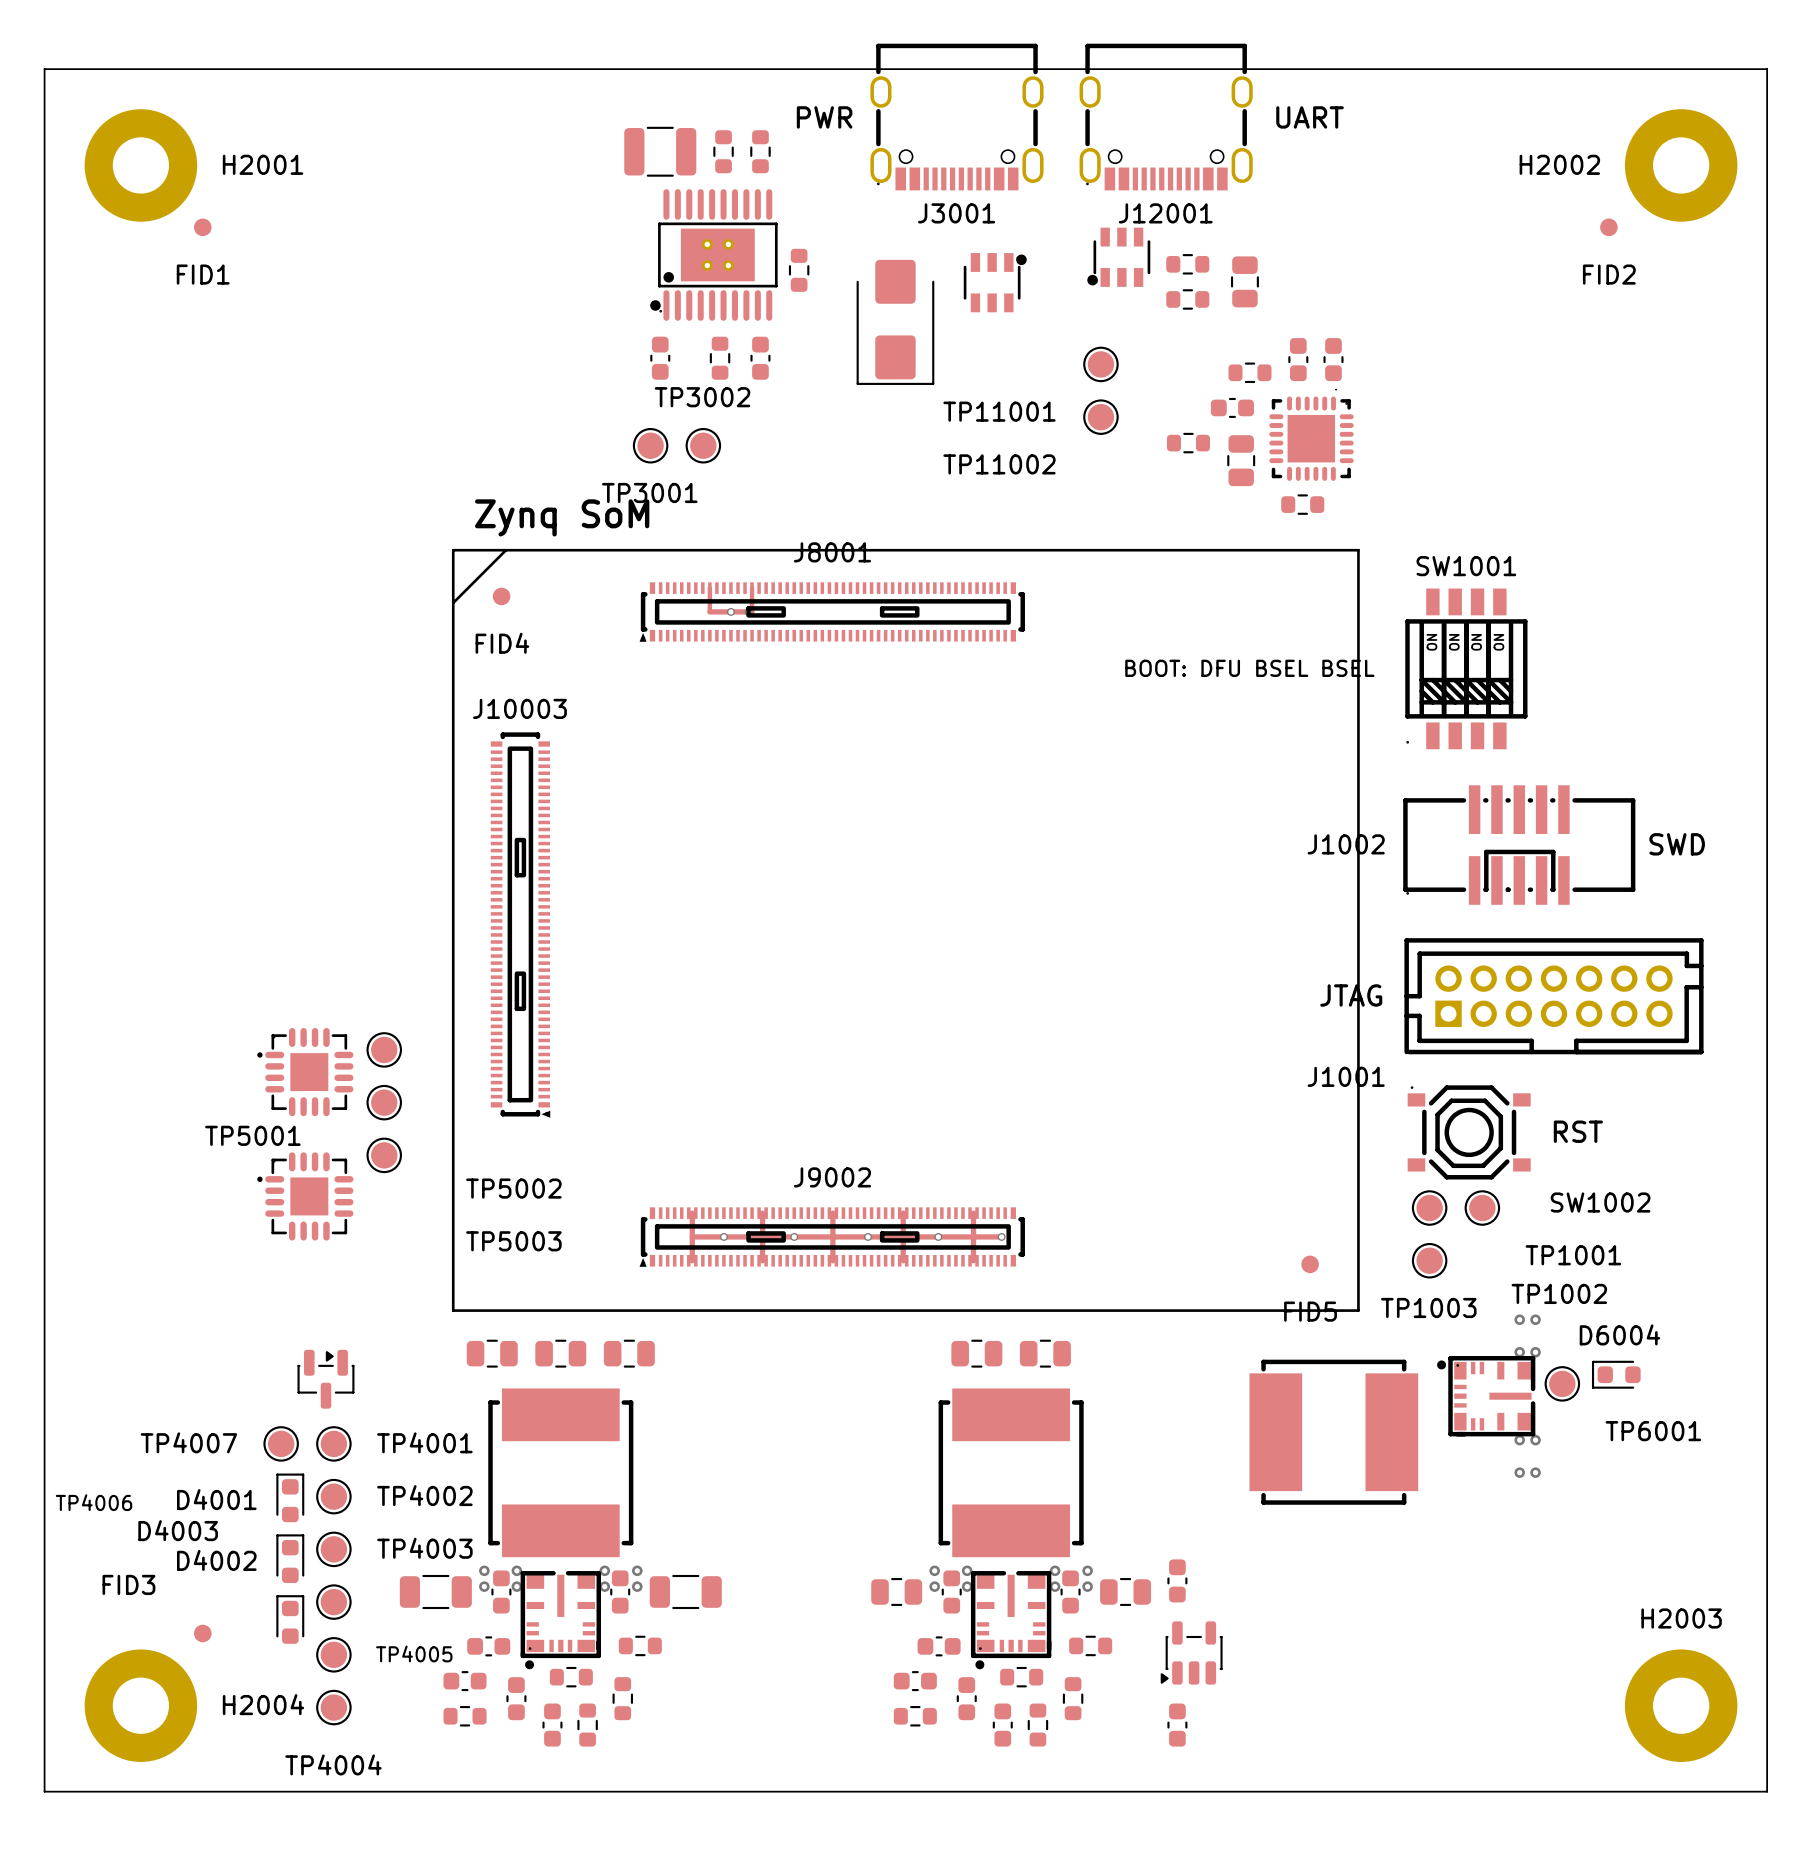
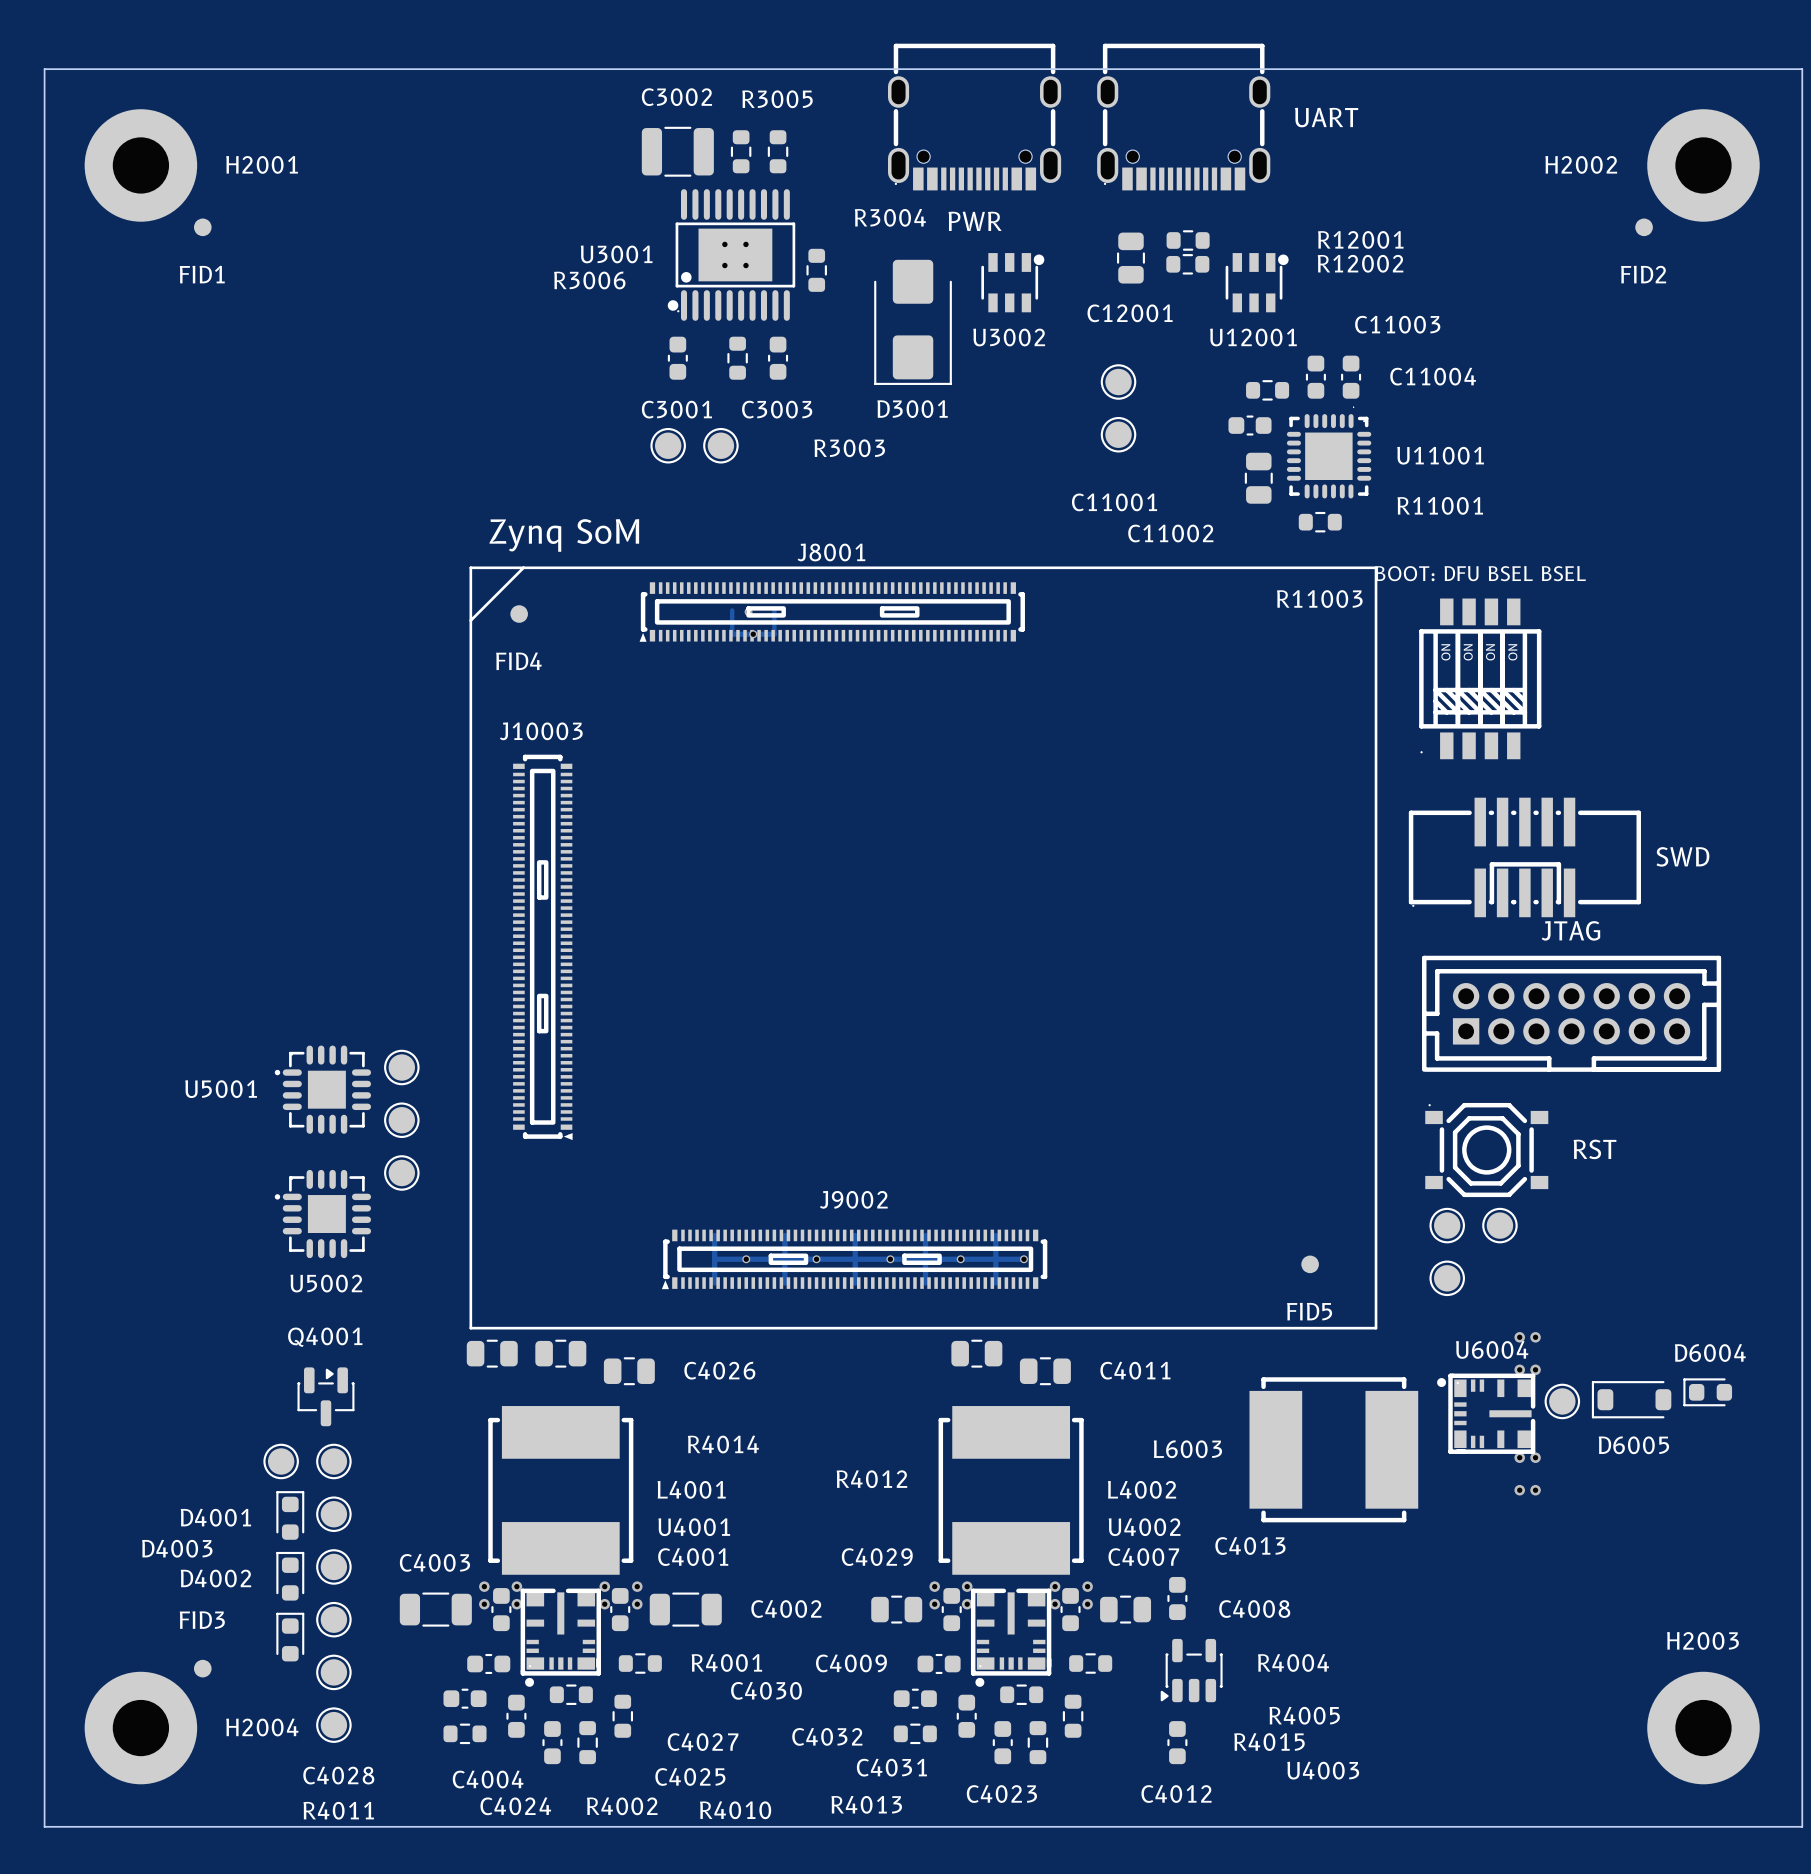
board edge: (1767, 69) (1767, 1791) (44, 1791) -> (1767, 69) (1802, 69) (1802, 1826) (44, 1826) (44, 1791)
C3002 name: none -> C3002 (676, 97)
text position: PWR (824, 117) -> PWR (975, 221)
J3001 position: (956, 117) -> (974, 117)
J12001 position: (1166, 117) -> (1183, 117)
text position: UART (1310, 117) -> UART (1326, 117)
C3002 position: (660, 151) -> (677, 151)
part: (723, 151) -> none
R3006: none -> (741, 151)
part: (760, 151) -> none
R3005: none -> (778, 151)
H2002 position: (1681, 165) -> (1703, 165)
J3001 name: J3001 (956, 213) -> none
J12001 name: J12001 (1165, 213) -> none
R3004 name: none -> R3004 (890, 217)
FID2 position: (1608, 227) -> (1644, 227)
R12001: none -> (1188, 240)
U3001 name: none -> U3001 (616, 254)
U3001 position: (713, 254) -> (731, 254)
part: (1118, 257) -> none
C12001: none -> (1130, 258)
R12002 name: none -> R12002 (1360, 263)
R3004 position: (799, 270) -> (816, 270)
part: (1244, 281) -> none
U3002 position: (995, 282) -> (1012, 282)
U12001: none -> (1257, 282)
part: (1187, 299) -> none
D3001 position: (895, 322) -> (913, 322)
U3002 name: none -> U3002 (1009, 337)
C3001 position: (660, 358) -> (677, 358)
R3003 position: (720, 358) -> (737, 358)
C3003 position: (760, 358) -> (778, 358)
part: (1298, 359) -> none
part: (1333, 359) -> none
TP11001: (1100, 364) -> none
part: (1250, 372) -> none
C11003: none -> (1315, 377)
C11004: none -> (1351, 377)
part: none -> (1118, 382)
R11001: none -> (1267, 390)
part: (1232, 407) -> none
C3001 name: none -> C3001 (676, 409)
C3003 name: none -> C3003 (777, 409)
D3001 name: none -> D3001 (912, 409)
TP11002: (1100, 417) -> none
C11001: none -> (1250, 425)
part: none -> (1118, 434)
part: (1311, 435) -> none
part: (1188, 443) -> none
TP3001: (650, 445) -> none
part: none -> (668, 445)
TP3002: (703, 445) -> none
part: none -> (720, 445)
R3003 name: none -> R3003 (849, 448)
U11001: none -> (1329, 452)
part: (1241, 460) -> none
C11002: none -> (1258, 478)
part: (1302, 504) -> none
text position: Zynq SoM (562, 517) -> Zynq SoM (564, 535)
R11003: none -> (1320, 522)
line: (453, 550) (1358, 550) (1358, 1310) (453, 1310) (453, 550) -> (470, 567) (1376, 567) (1376, 1328) (470, 1328) (470, 567)
line: (505, 550) (453, 602) -> (523, 567) (470, 620)
SW1001 name: SW1001 (1466, 566) -> none
track: (709, 588) (709, 611) (752, 611) (752, 588) -> (732, 610) (732, 634) (774, 634) (774, 610)
FID4 position: (501, 596) -> (519, 614)
via position: (730, 611) -> (753, 634)
text position: BOOT: DFU BSEL BSEL (1249, 668) -> BOOT: DFU BSEL BSEL (1480, 573)
SW1001 position: (1466, 668) -> (1480, 678)
J1002 name: J1002 (1346, 844) -> none
text position: SWD (1677, 844) -> SWD (1682, 856)
J1002 position: (1519, 845) -> (1524, 857)
J10003 position: (520, 925) -> (542, 947)
text position: JTAG (1351, 995) -> JTAG (1570, 930)
J1001: (1554, 996) -> none
part: none -> (1571, 1013)
TP5001: (384, 1049) -> none
part: none -> (401, 1067)
part: (305, 1072) -> none
U5001: none -> (322, 1089)
TP5002: (384, 1102) -> none
part: none -> (401, 1120)
text position: RST (1578, 1131) -> RST (1595, 1149)
SW1002: (1469, 1132) -> none
part: none -> (1486, 1150)
TP5003: (384, 1155) -> none
part: none -> (401, 1172)
part: (305, 1196) -> none
TP1002: (1429, 1208) -> none
TP1001: (1482, 1208) -> none
track: (692, 1213) (692, 1260) -> (714, 1235) (714, 1283)
track: (762, 1213) (762, 1260) -> (784, 1235) (784, 1283)
track: (832, 1213) (832, 1260) -> (855, 1235) (855, 1283)
track: (903, 1213) (903, 1260) -> (925, 1235) (925, 1283)
track: (973, 1213) (973, 1260) -> (995, 1235) (995, 1283)
U5002: none -> (322, 1214)
part: none -> (1447, 1225)
part: none -> (1499, 1225)
track: (692, 1236) (1001, 1236) -> (714, 1259) (1023, 1259)
via: (723, 1236) -> none
via: (794, 1236) -> none
via: (868, 1236) -> none
via: (938, 1236) -> none
via: (1001, 1236) -> none
J9002 position: (832, 1237) -> (854, 1259)
via: none -> (746, 1259)
via: none -> (816, 1259)
via: none -> (890, 1259)
via: none -> (960, 1259)
via: none -> (1023, 1259)
TP1003: (1429, 1260) -> none
part: none -> (1447, 1278)
via: (1519, 1319) -> none
via: (1535, 1319) -> none
Q4001 name: none -> Q4001 (325, 1337)
via: none -> (1519, 1337)
via: none -> (1535, 1337)
U6004 name: none -> U6004 (1492, 1349)
via: (1519, 1352) -> none
via: (1535, 1352) -> none
C4026 position: (629, 1353) -> (629, 1371)
C4011 position: (1045, 1353) -> (1045, 1371)
via: none -> (1519, 1369)
via: none -> (1535, 1369)
C4026 name: none -> C4026 (719, 1370)
C4011 name: none -> C4011 (1135, 1370)
D6004 position: (1616, 1374) -> (1707, 1392)
Q4001 position: (325, 1379) -> (325, 1396)
TP6001 position: (1562, 1383) -> (1562, 1401)
U6004 position: (1486, 1396) -> (1486, 1413)
D6005: none -> (1631, 1399)
TP6001 name: TP6001 (1653, 1431) -> none
L6003 position: (1333, 1432) -> (1333, 1449)
via: (1519, 1440) -> none
via: (1535, 1440) -> none
TP4007 name: TP4007 (188, 1442) -> none
TP4007 position: (281, 1443) -> (281, 1461)
TP4001: (333, 1443) -> none
R4014 name: none -> R4014 (723, 1444)
L6003 name: none -> L6003 (1187, 1449)
via: none -> (1519, 1457)
via: none -> (1535, 1457)
part: none -> (333, 1461)
L4001 position: (560, 1472) -> (560, 1490)
L4002 position: (1011, 1472) -> (1011, 1490)
via: (1519, 1472) -> none
via: (1535, 1472) -> none
R4012 name: none -> R4012 (871, 1479)
L4001 name: none -> L4001 (691, 1489)
L4002 name: none -> L4002 (1142, 1489)
via: none -> (1519, 1490)
via: none -> (1535, 1490)
TP4002: (333, 1496) -> none
D4001 position: (290, 1497) -> (290, 1515)
part: none -> (333, 1514)
U4001 name: none -> U4001 (694, 1527)
U4002 name: none -> U4002 (1144, 1527)
C4013 name: none -> C4013 (1250, 1546)
TP4003: (333, 1549) -> none
C4001 name: none -> C4001 (693, 1557)
C4029 name: none -> C4029 (877, 1557)
C4007 name: none -> C4007 (1143, 1557)
D4002 position: (290, 1558) -> (290, 1576)
C4003 name: none -> C4003 (434, 1562)
part: none -> (333, 1566)
via: (484, 1570) -> none
via: (516, 1570) -> none
via: (604, 1570) -> none
via: (637, 1570) -> none
via: (934, 1570) -> none
via: (967, 1570) -> none
via: (1055, 1570) -> none
via: (1087, 1570) -> none
C4013 position: (1177, 1580) -> (1177, 1598)
FID3 name position: FID3 (128, 1584) -> FID3 (202, 1620)
C4003 position: (435, 1591) -> (435, 1609)
C4025 position: (501, 1591) -> (501, 1609)
C4001 position: (620, 1591) -> (620, 1609)
C4002 position: (685, 1591) -> (685, 1609)
C4030 position: (896, 1591) -> (896, 1609)
C4029 position: (951, 1591) -> (951, 1609)
C4007 position: (1070, 1591) -> (1070, 1609)
C4008 position: (1125, 1591) -> (1125, 1609)
TP4004: (333, 1602) -> none
via: none -> (484, 1604)
via: none -> (516, 1604)
via: none -> (604, 1604)
via: none -> (637, 1604)
via: none -> (934, 1604)
via: none -> (967, 1604)
via: none -> (1055, 1604)
via: none -> (1087, 1604)
C4002 name: none -> C4002 (786, 1609)
C4008 name: none -> C4008 (1254, 1609)
D4003 position: (290, 1619) -> (290, 1637)
part: none -> (333, 1619)
U4001 position: (560, 1620) -> (560, 1637)
U4002 position: (1011, 1620) -> (1011, 1637)
FID3 position: (202, 1633) -> (202, 1668)
R4001 position: (640, 1645) -> (640, 1663)
R4004 position: (1090, 1645) -> (1090, 1663)
part: (488, 1646) -> none
part: (939, 1646) -> none
U4003 position: (1191, 1652) -> (1191, 1670)
TP4005: (333, 1654) -> none
R4001 name: none -> R4001 (726, 1662)
R4004 name: none -> R4004 (1293, 1662)
C4004: none -> (488, 1663)
C4009: none -> (939, 1663)
part: none -> (333, 1672)
R4010 position: (571, 1677) -> (571, 1694)
R4014 position: (1021, 1677) -> (1021, 1694)
part: (465, 1681) -> none
part: (915, 1681) -> none
C4030 name: none -> C4030 (766, 1690)
C4028: none -> (465, 1698)
C4024 position: (516, 1698) -> (516, 1716)
R4002 position: (622, 1698) -> (622, 1716)
C4032: none -> (915, 1698)
C4031 position: (966, 1698) -> (966, 1716)
R4005 position: (1073, 1698) -> (1073, 1716)
H2004 position: (140, 1705) -> (140, 1728)
H2003 position: (1681, 1705) -> (1703, 1728)
TP4006: (333, 1707) -> none
R4005 name: none -> R4005 (1304, 1715)
R4011 position: (465, 1716) -> (465, 1733)
R4013 position: (915, 1716) -> (915, 1733)
part: none -> (333, 1725)
C4027 position: (552, 1725) -> (552, 1742)
R4012 position: (587, 1725) -> (587, 1742)
C4023 position: (1002, 1725) -> (1002, 1742)
R4015 position: (1037, 1725) -> (1037, 1742)
C4012 position: (1177, 1725) -> (1177, 1742)
C4027 name: none -> C4027 (703, 1742)
R4015 name: none -> R4015 (1269, 1742)
C4031 name: none -> C4031 (891, 1767)
U4003 name: none -> U4003 (1323, 1770)
C4025 name: none -> C4025 (690, 1776)
C4023 name: none -> C4023 (1001, 1794)
C4012 name: none -> C4012 (1176, 1794)
R4013 name: none -> R4013 (866, 1804)
C4024 name: none -> C4024 (515, 1806)
R4002 name: none -> R4002 (622, 1806)
R4010 name: none -> R4010 (735, 1810)
R4011 name: none -> R4011 (338, 1810)

